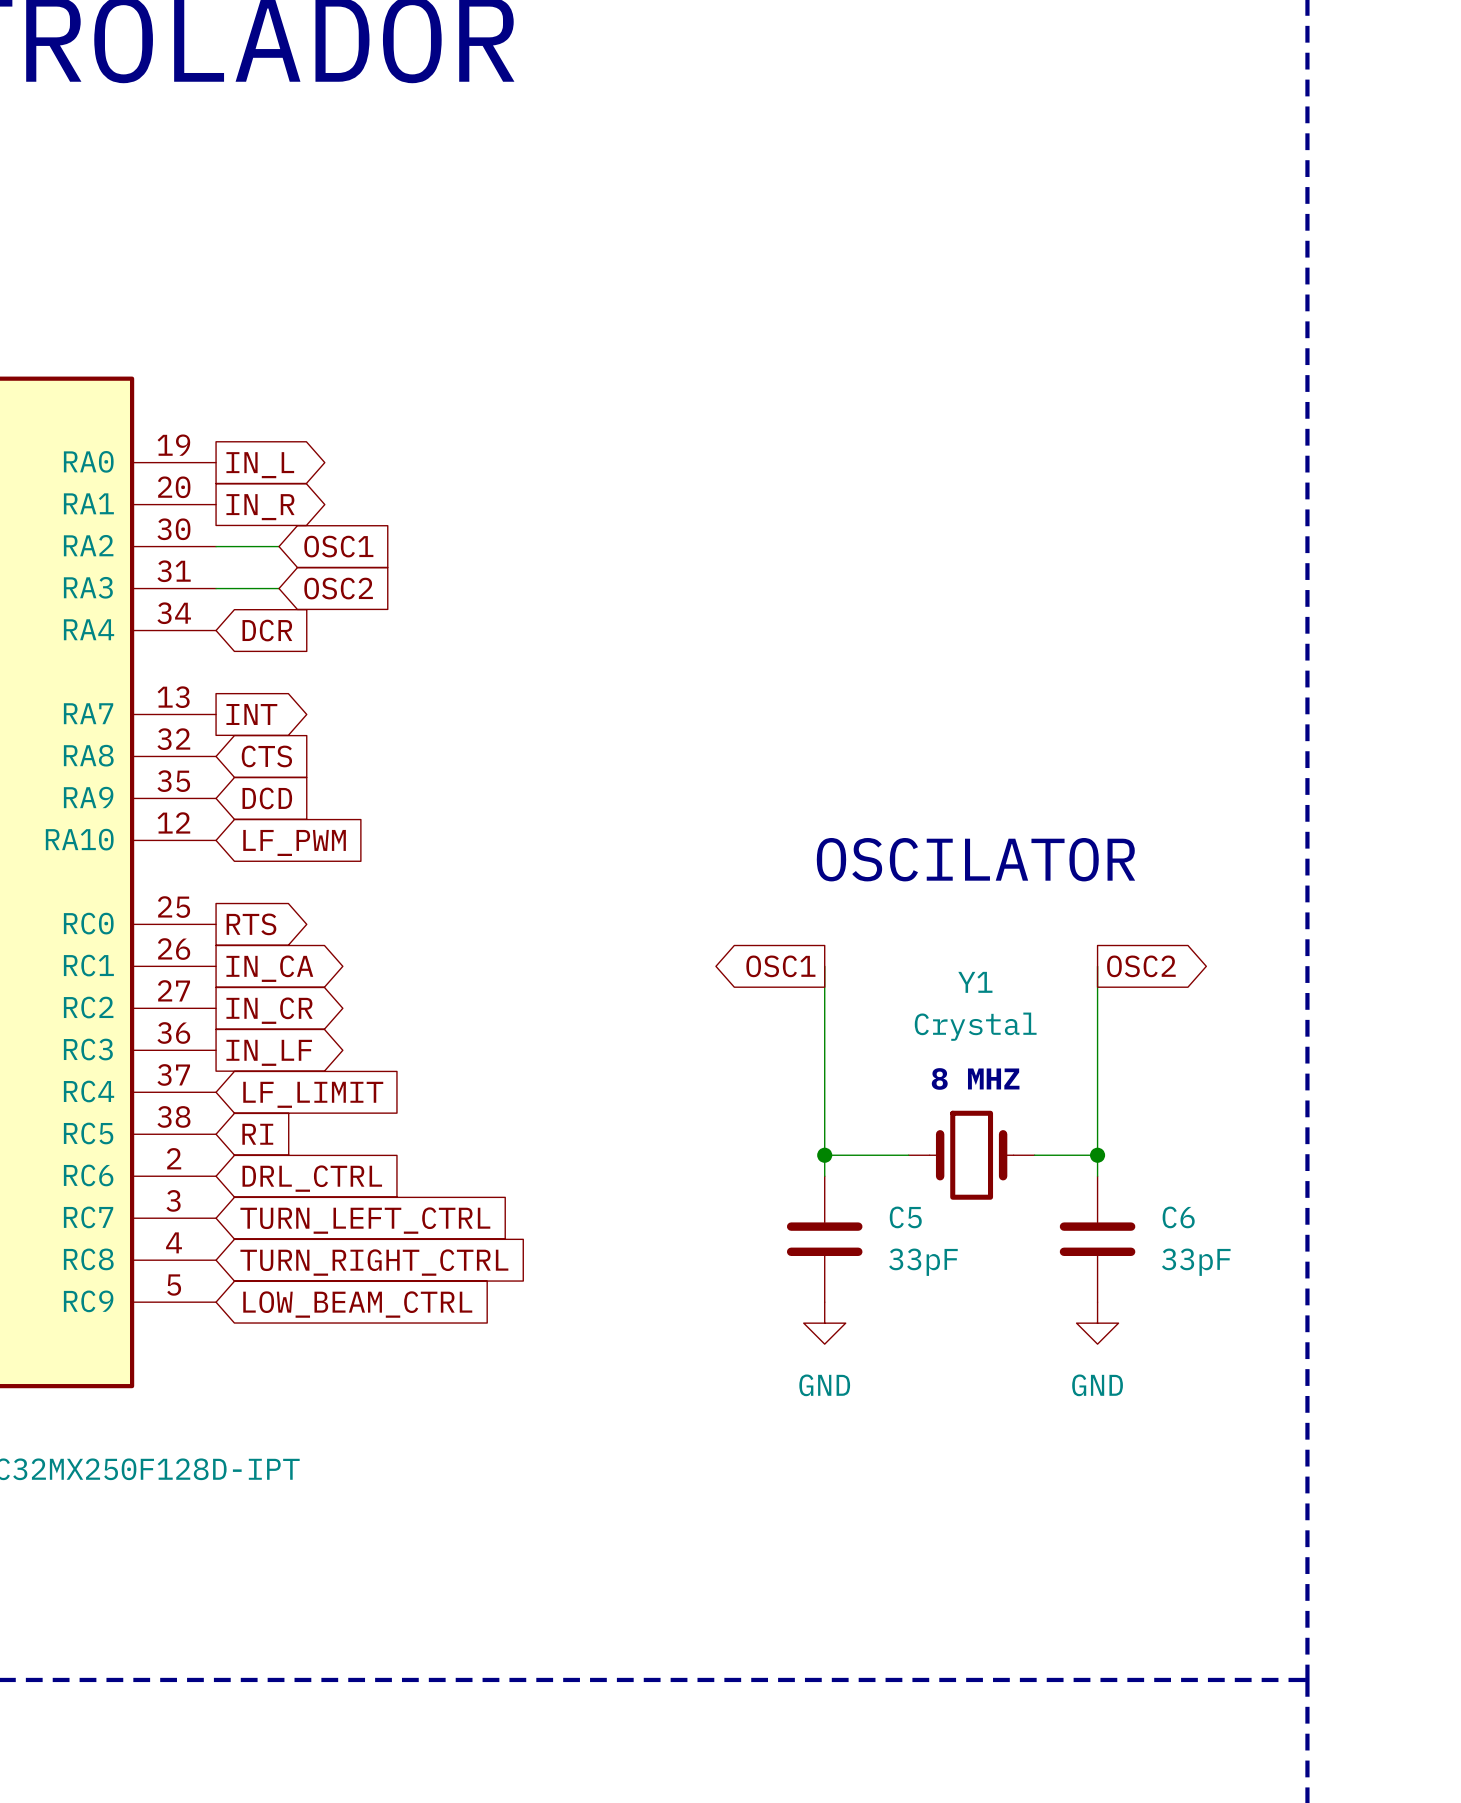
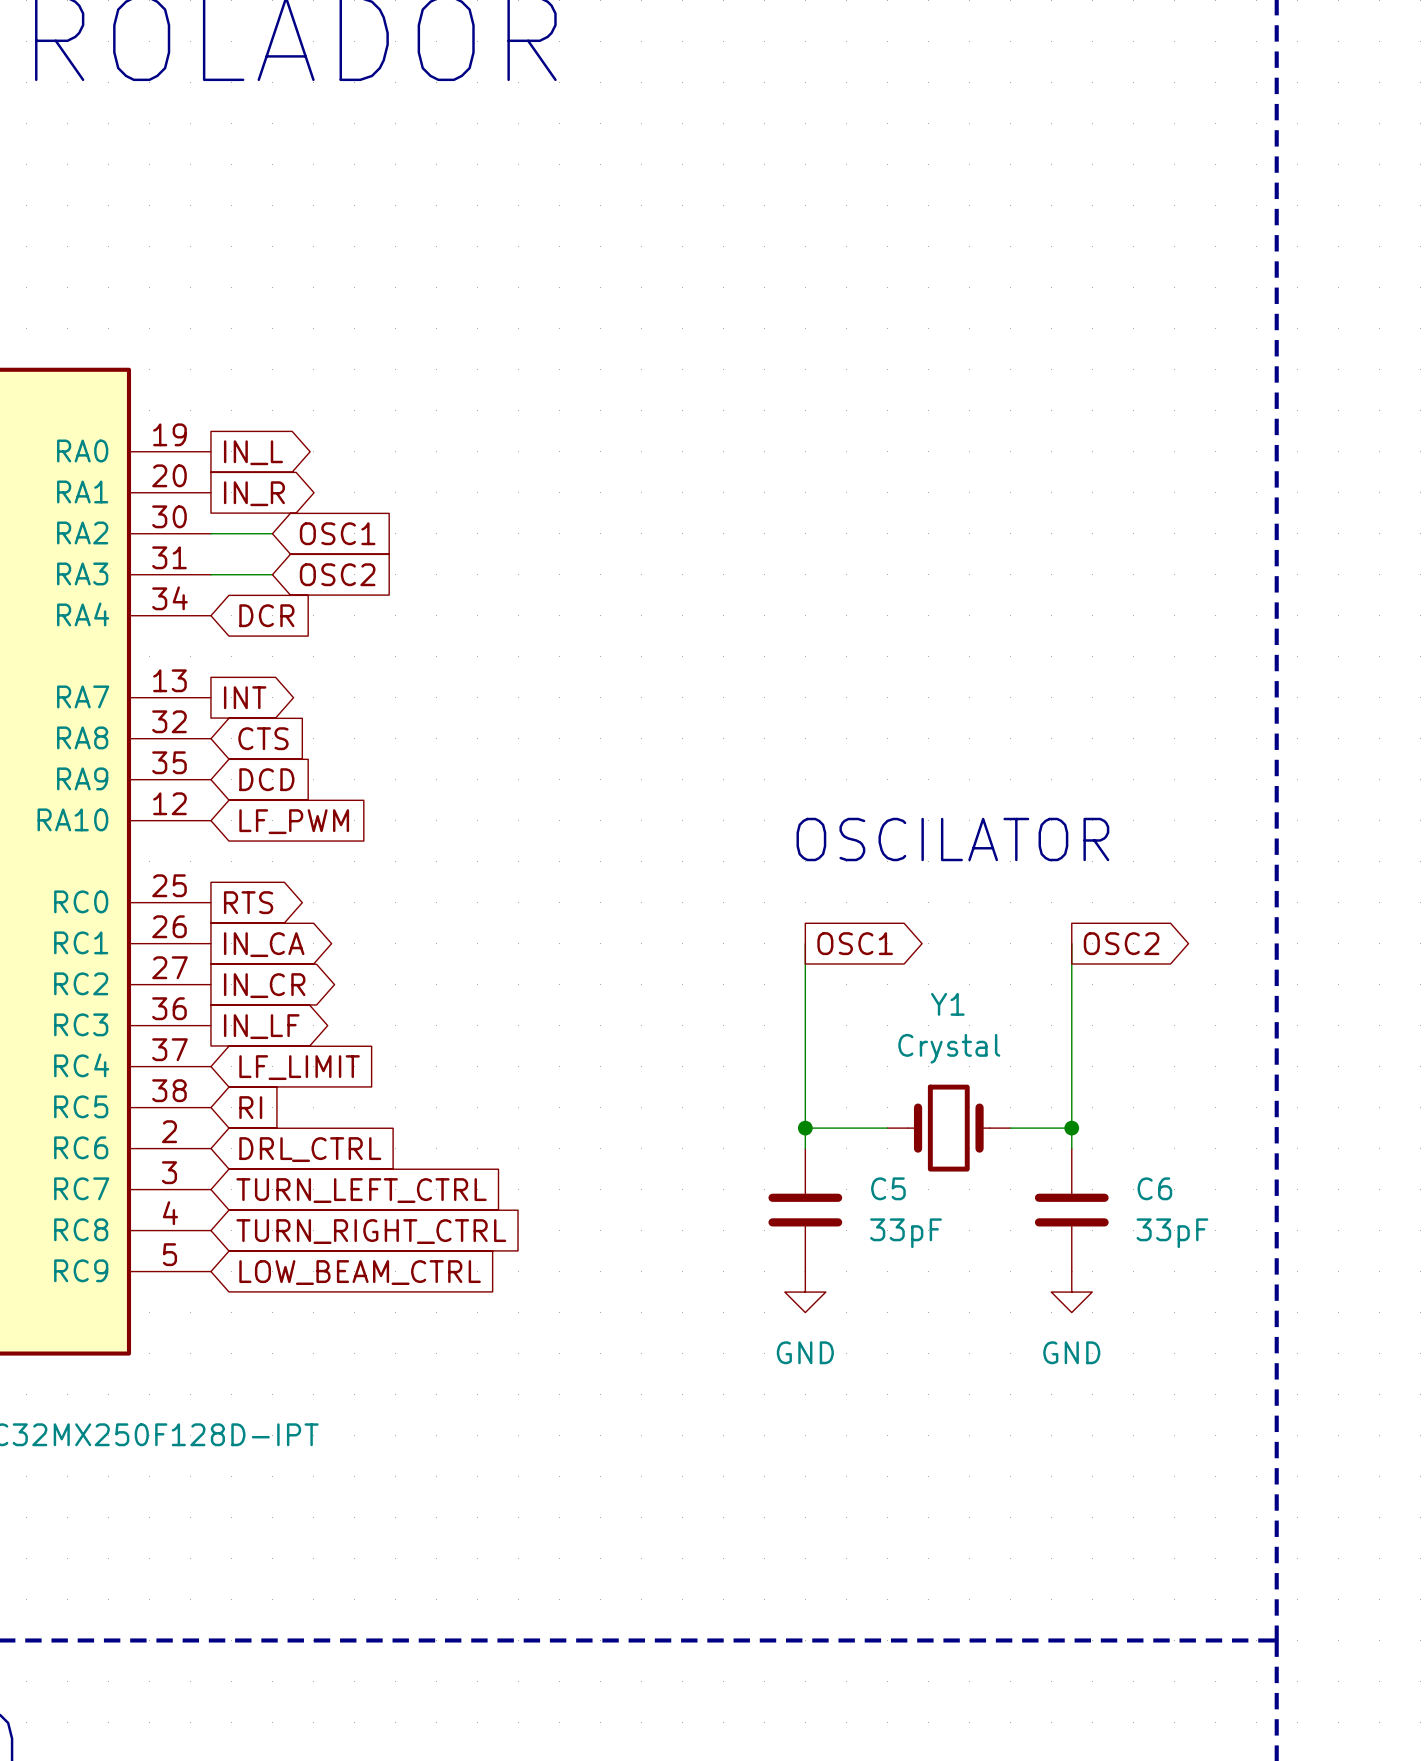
global label rotation: 0° (780, 966) -> 180° (855, 943)
Y1 name position: Y1 (975, 982) -> Y1 (947, 1004)
Y1 value position: Crystal (975, 1026) -> Crystal (949, 1048)
text: 8 MHZ (975, 1078) -> none

